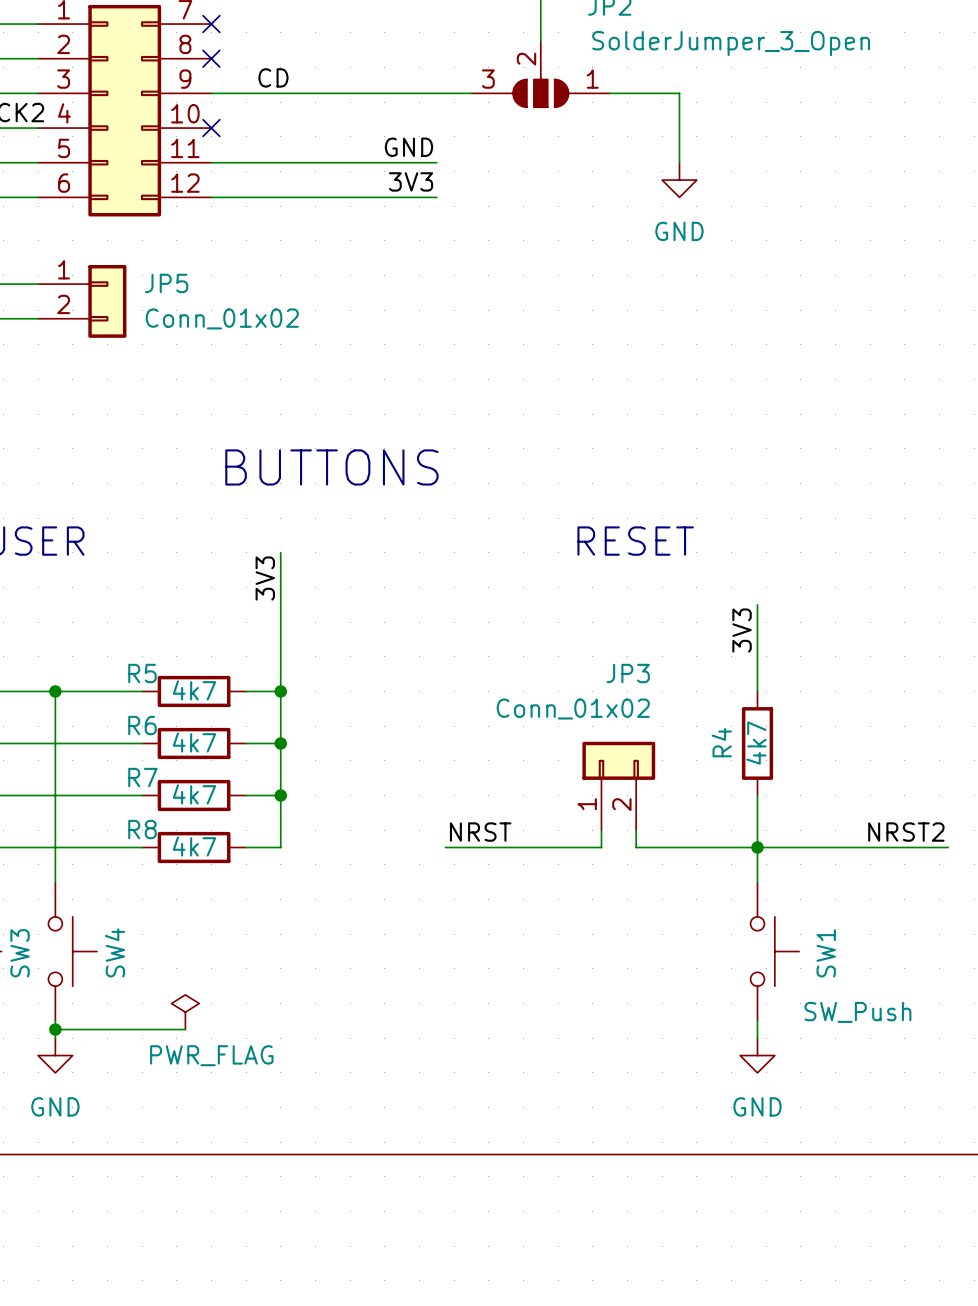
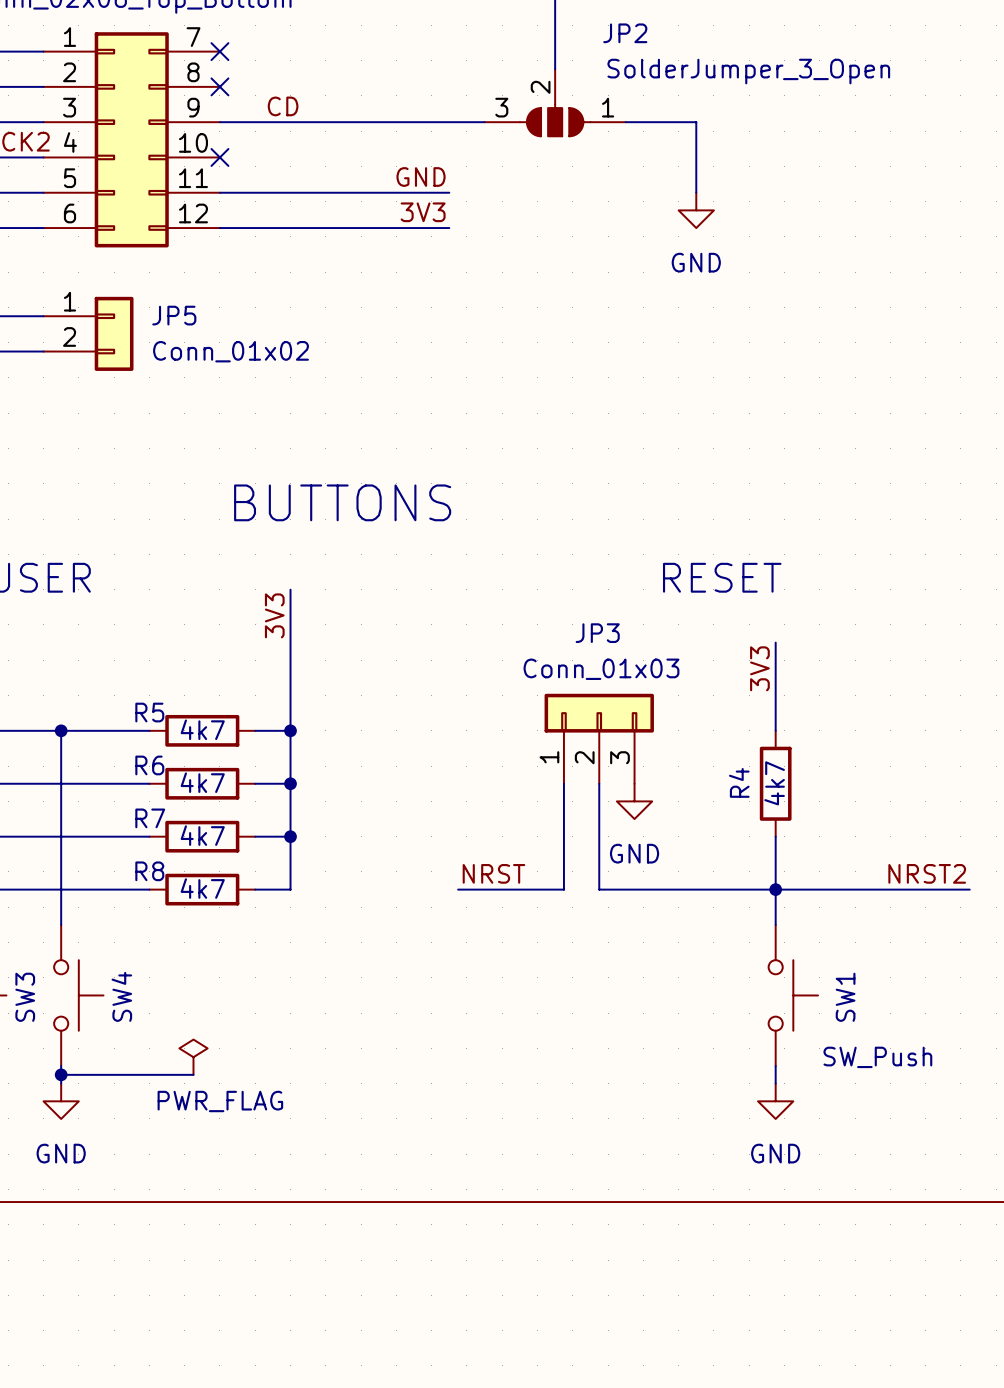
text position: RESET (635, 541) -> RESET (722, 577)
JP3 value: Conn_01x02 (573, 709) -> Conn_01x03 (601, 669)
JP3 symbol: [582, 741, 656, 831] -> [544, 693, 654, 784]
wire: none -> (599, 783) (599, 889)
power symbol: none -> GND (634, 801)
wire: (601, 830) (601, 847) -> (652, 889) (616, 889)
wire: (636, 830) (636, 847) -> none
wire: (549, 847) (584, 847) -> (563, 889) (563, 783)

